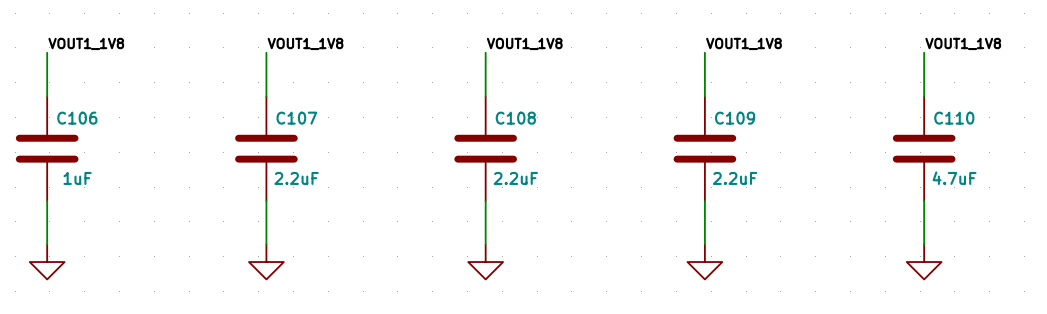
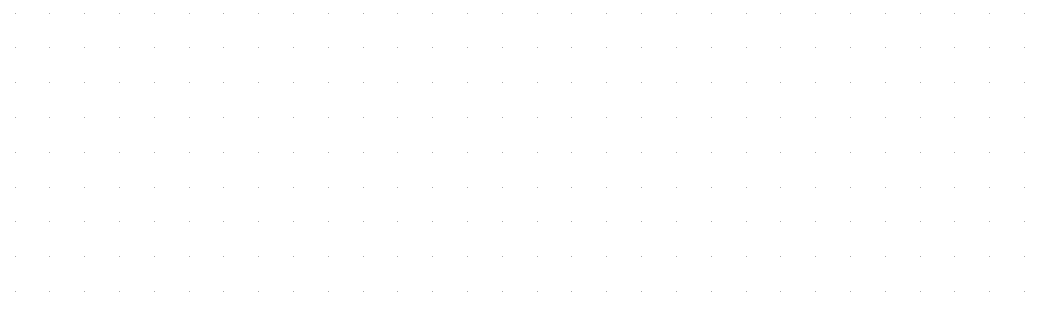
label: VOUT1_1V8 (86, 43) -> none
label: VOUT1_1V8 (305, 43) -> none
label: VOUT1_1V8 (524, 43) -> none
label: VOUT1_1V8 (743, 43) -> none
label: VOUT1_1V8 (963, 43) -> none
wire: (47, 52) (47, 96) -> none
wire: (266, 52) (266, 96) -> none
wire: (485, 52) (485, 96) -> none
wire: (704, 52) (704, 96) -> none
wire: (924, 52) (924, 96) -> none
C106: 1uF (47, 148) -> none
C107: 2.2uF (266, 148) -> none
C108: 2.2uF (485, 148) -> none
C109: 2.2uF (704, 148) -> none
C110: 4.7uF (924, 148) -> none
wire: (47, 200) (47, 244) -> none
wire: (266, 200) (266, 244) -> none
wire: (485, 200) (485, 244) -> none
wire: (704, 200) (704, 244) -> none
wire: (924, 200) (924, 244) -> none
power symbol: (47, 262) -> none
power symbol: (266, 262) -> none
power symbol: (485, 262) -> none
power symbol: (704, 262) -> none
power symbol: (924, 262) -> none

